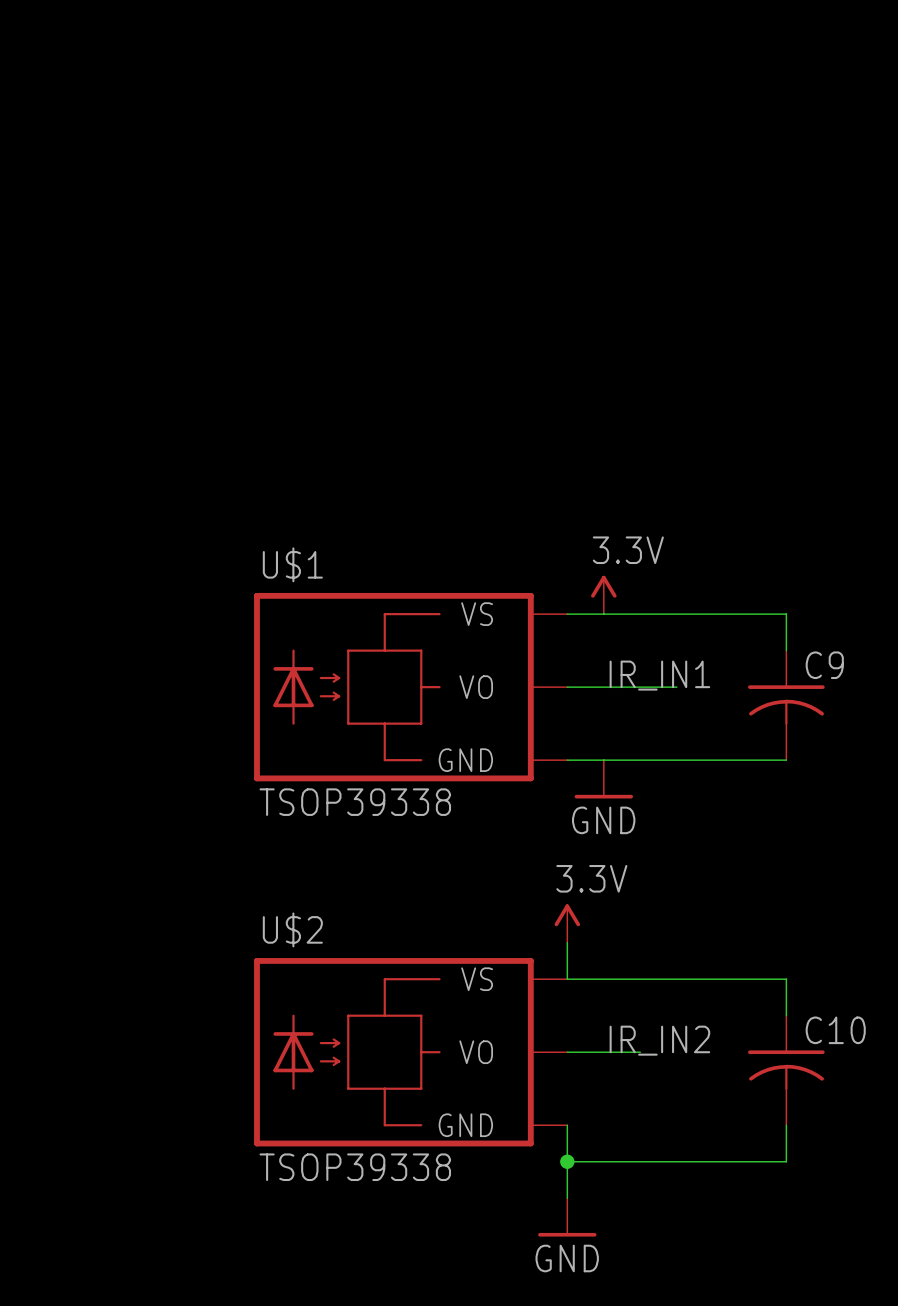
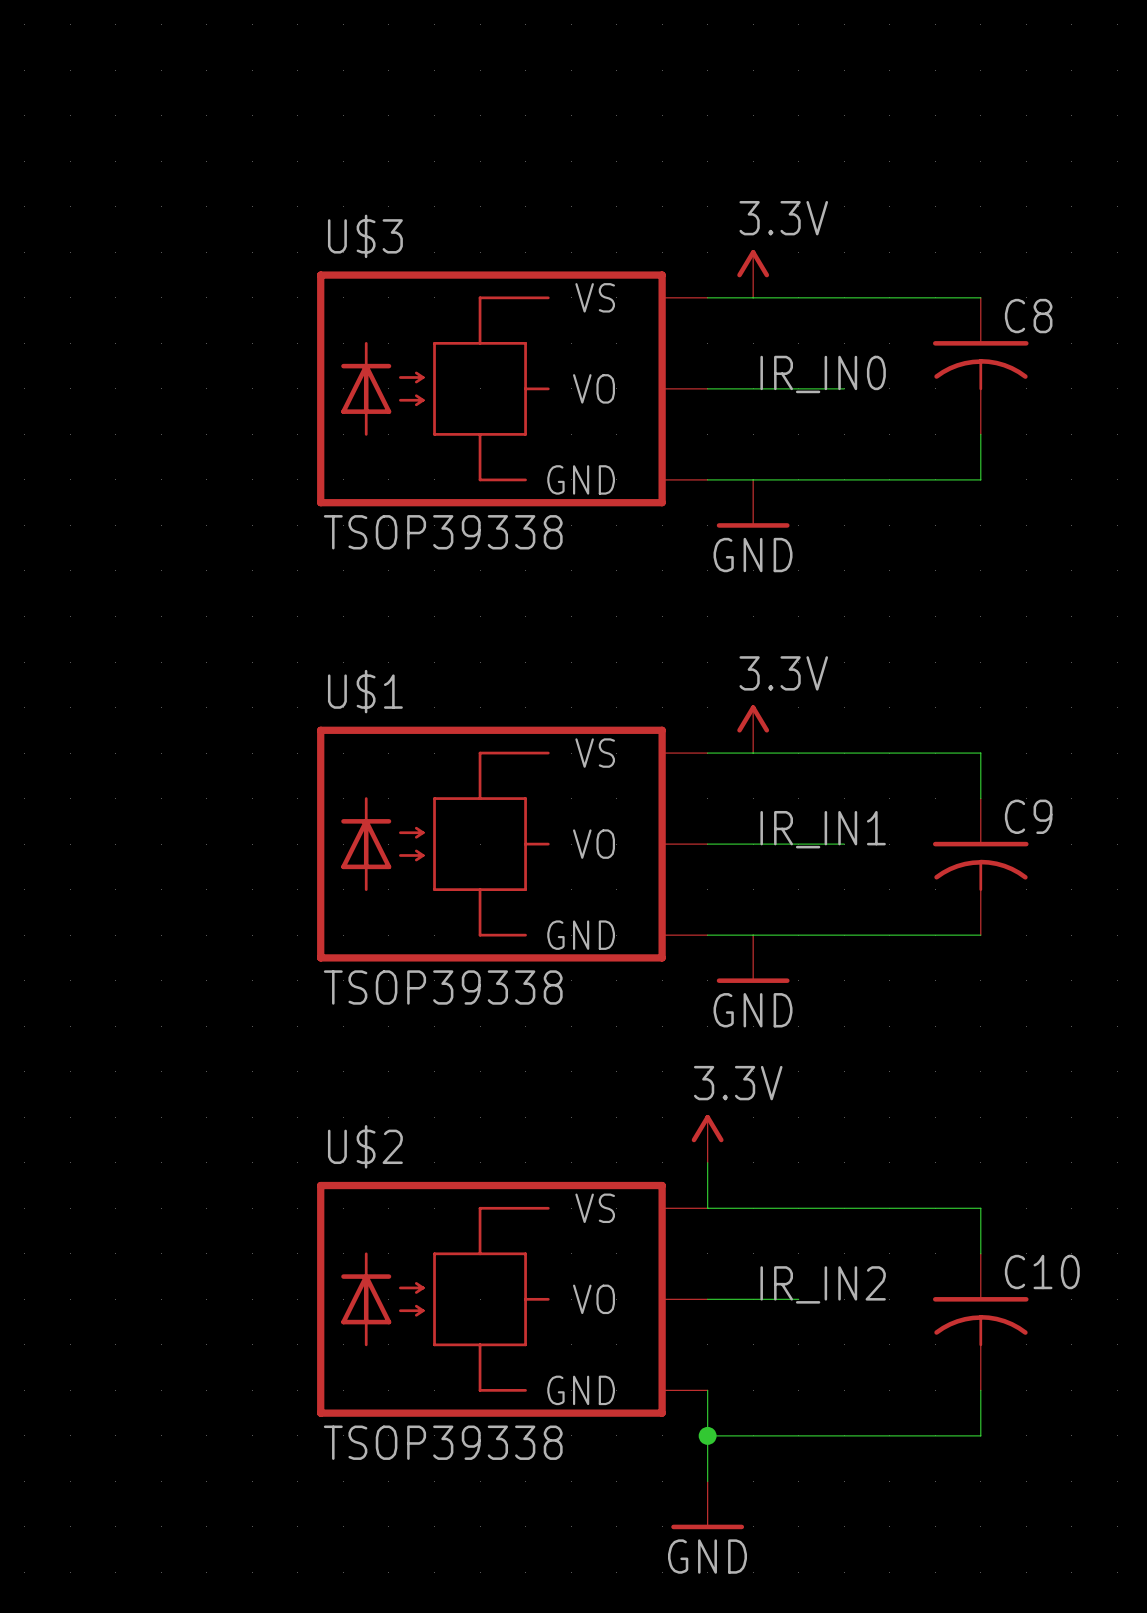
power symbol: none -> 3.3V (753, 273)
wire: none -> (707, 297) (980, 297)
C8: none -> (980, 366)
label: none -> IR_IN0 (823, 374)
U$3: none -> TSOP39338 (512, 388)
wire: none -> (707, 388) (844, 388)
wire: none -> (980, 434) (980, 479) (707, 479)
power symbol: none -> GND (753, 503)

